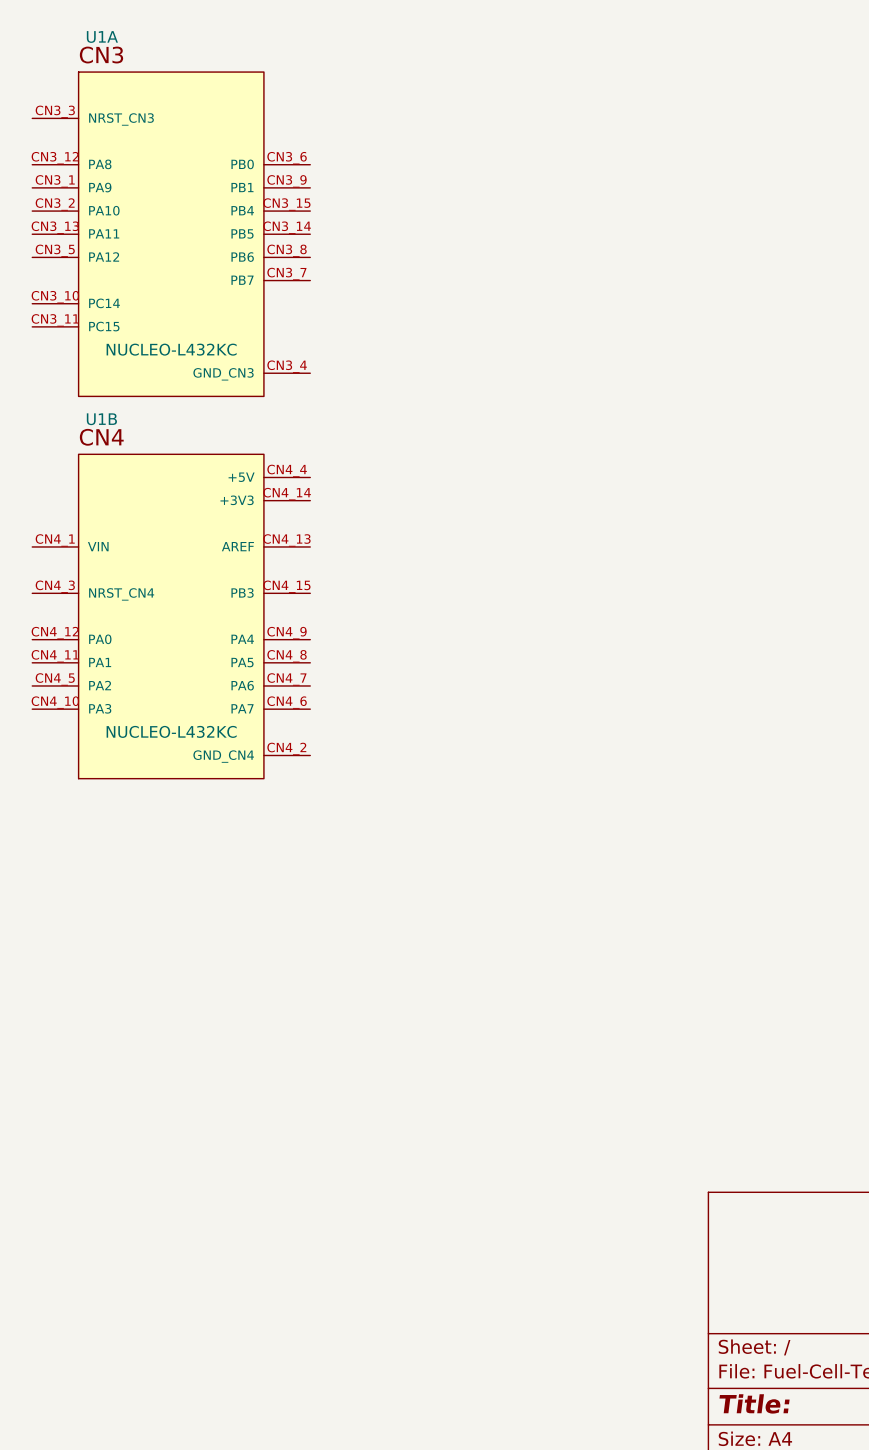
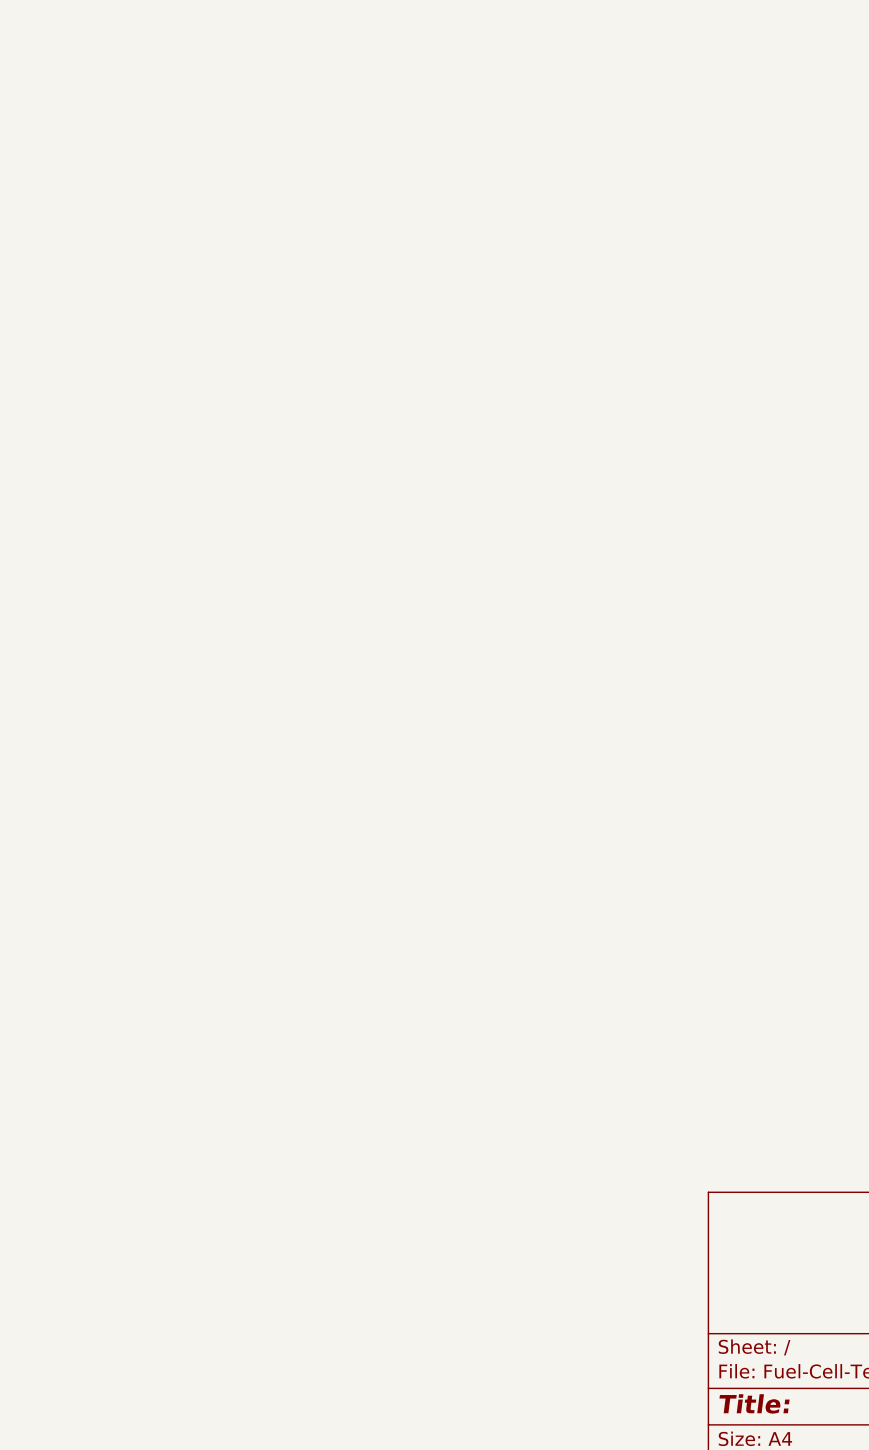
U1A: NUCLEO-L432KC (171, 234) -> none
U1B: NUCLEO-L432KC (171, 616) -> none

